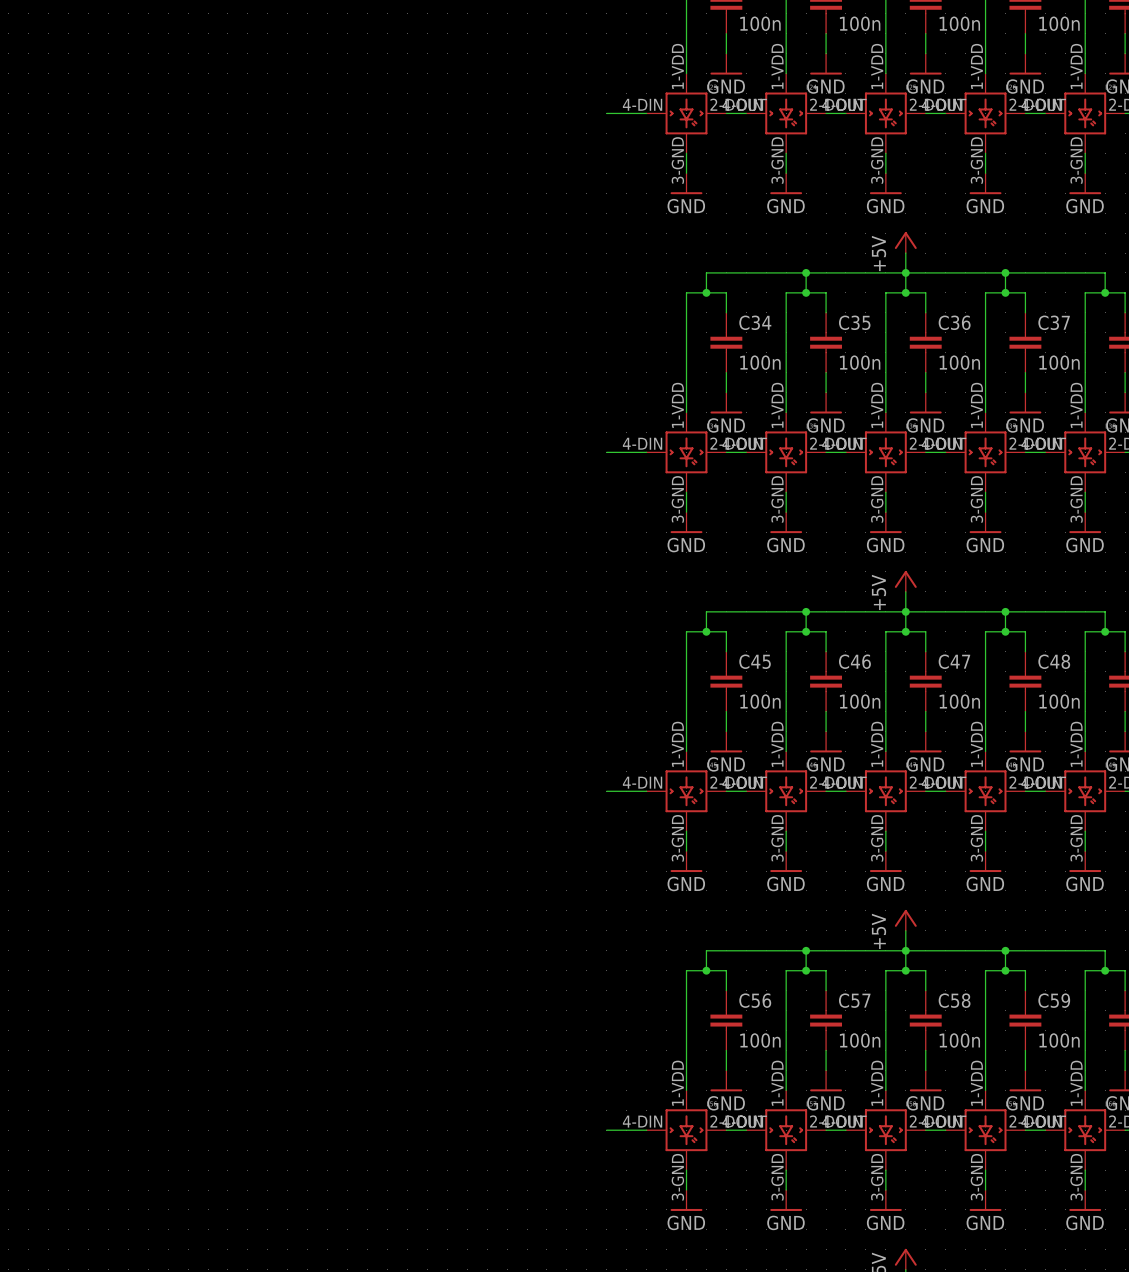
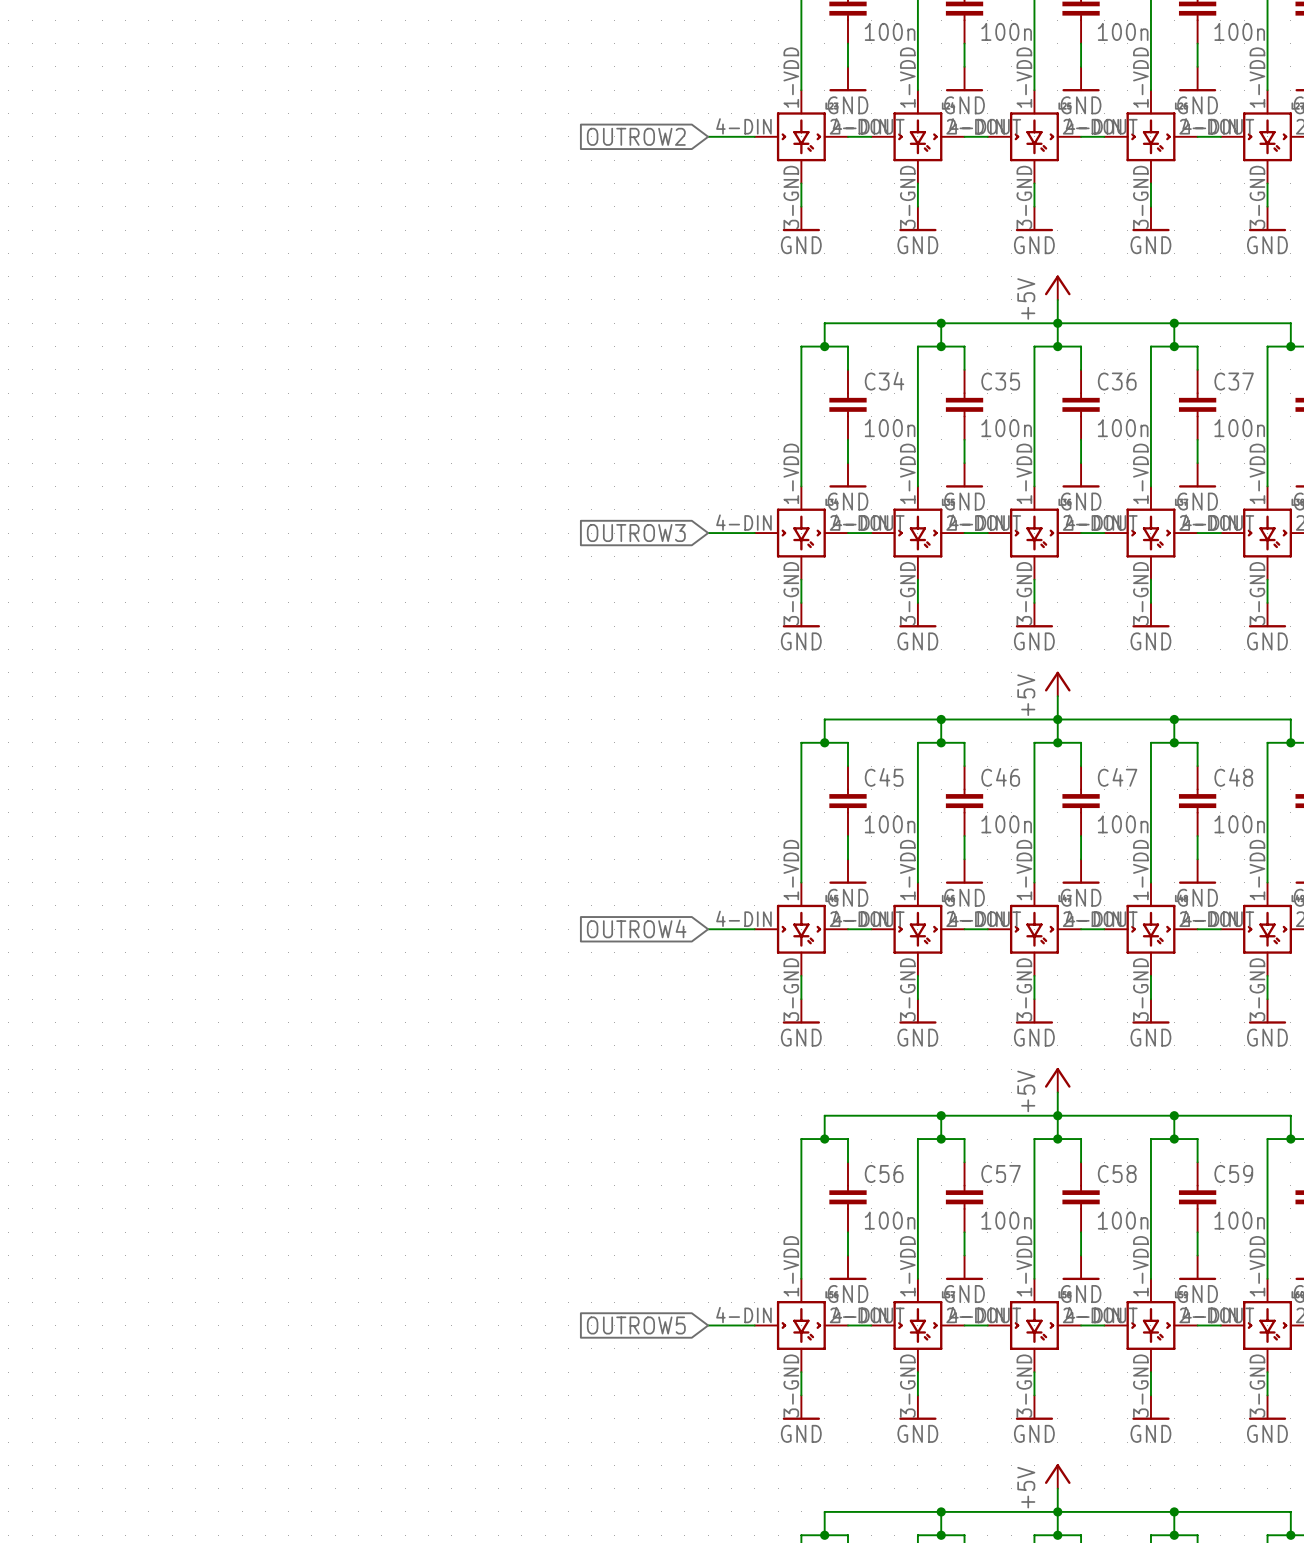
global label: none -> OUTROW2 (636, 136)
global label: none -> OUTROW3 (636, 533)
global label: none -> OUTROW4 (636, 928)
global label: none -> OUTROW5 (636, 1325)

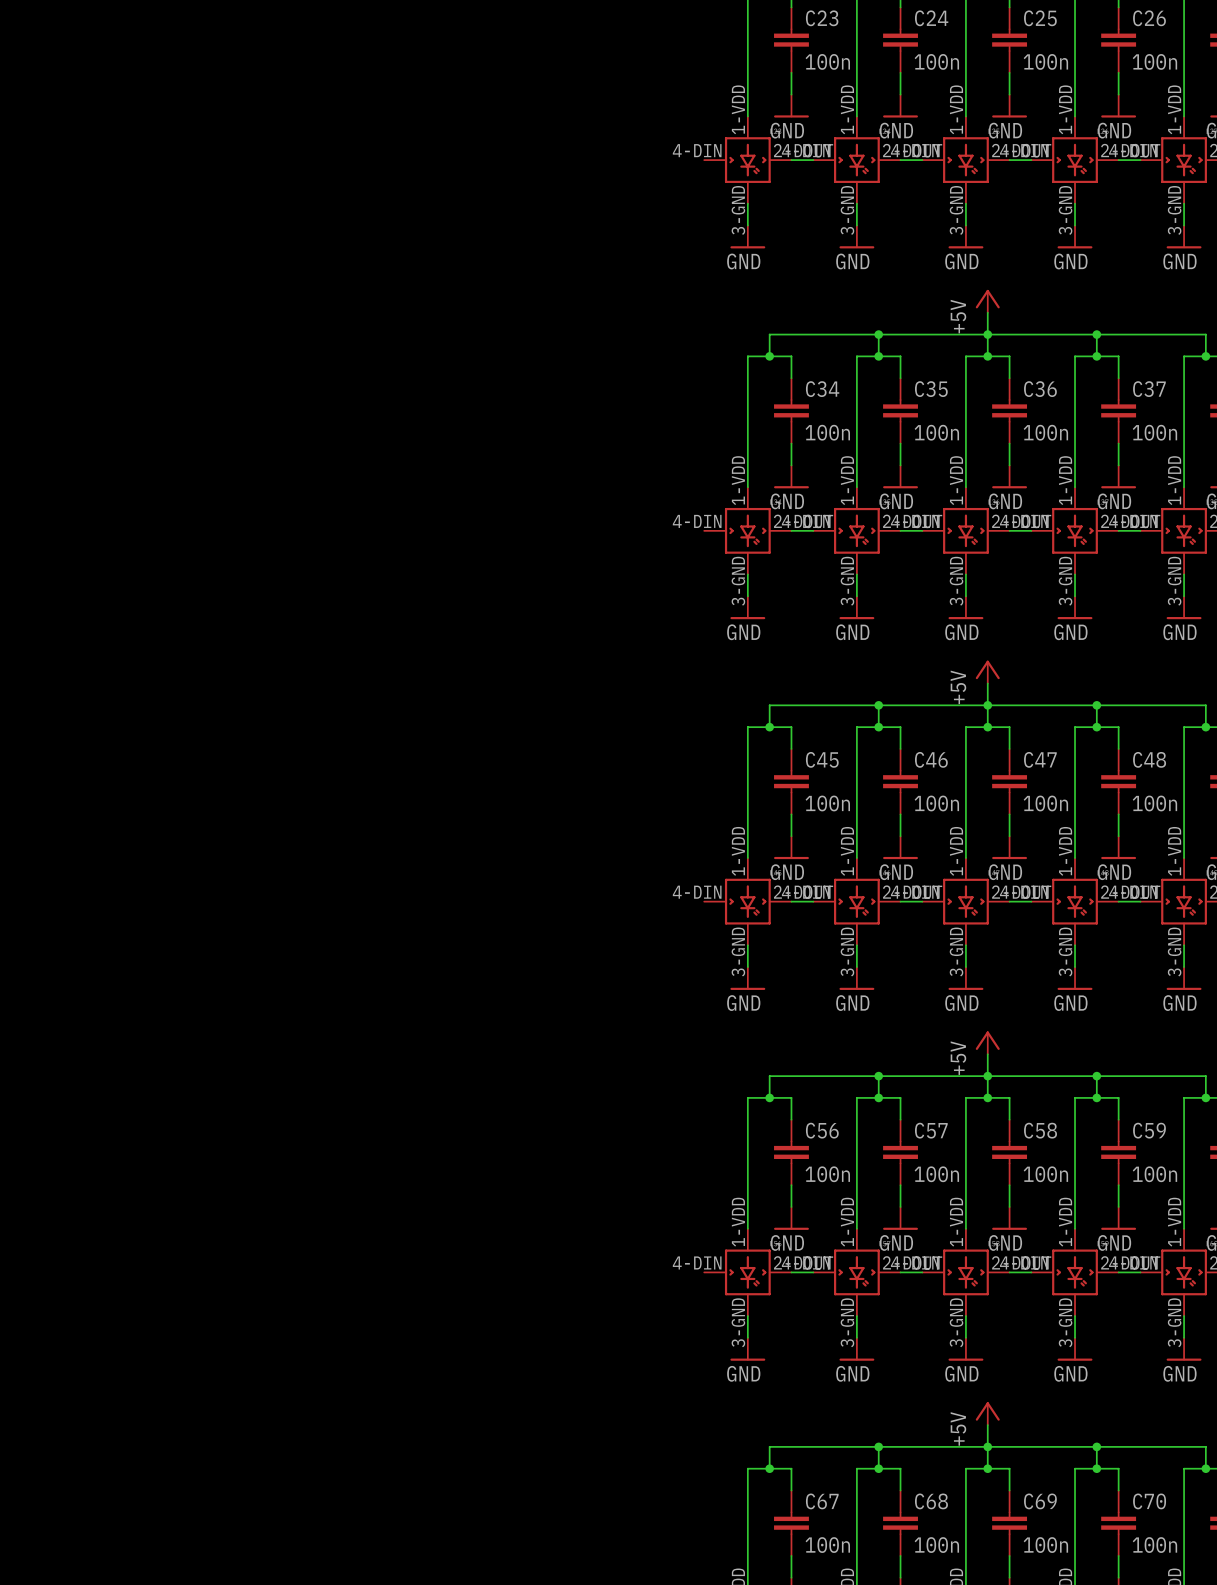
global label: OUTROW2 (636, 136) -> none
wire: (708, 136) (754, 136) -> none
global label: OUTROW3 (636, 533) -> none
wire: (708, 533) (754, 533) -> none
global label: OUTROW4 (636, 928) -> none
wire: (708, 929) (754, 929) -> none
global label: OUTROW5 (636, 1325) -> none
wire: (708, 1325) (754, 1325) -> none

